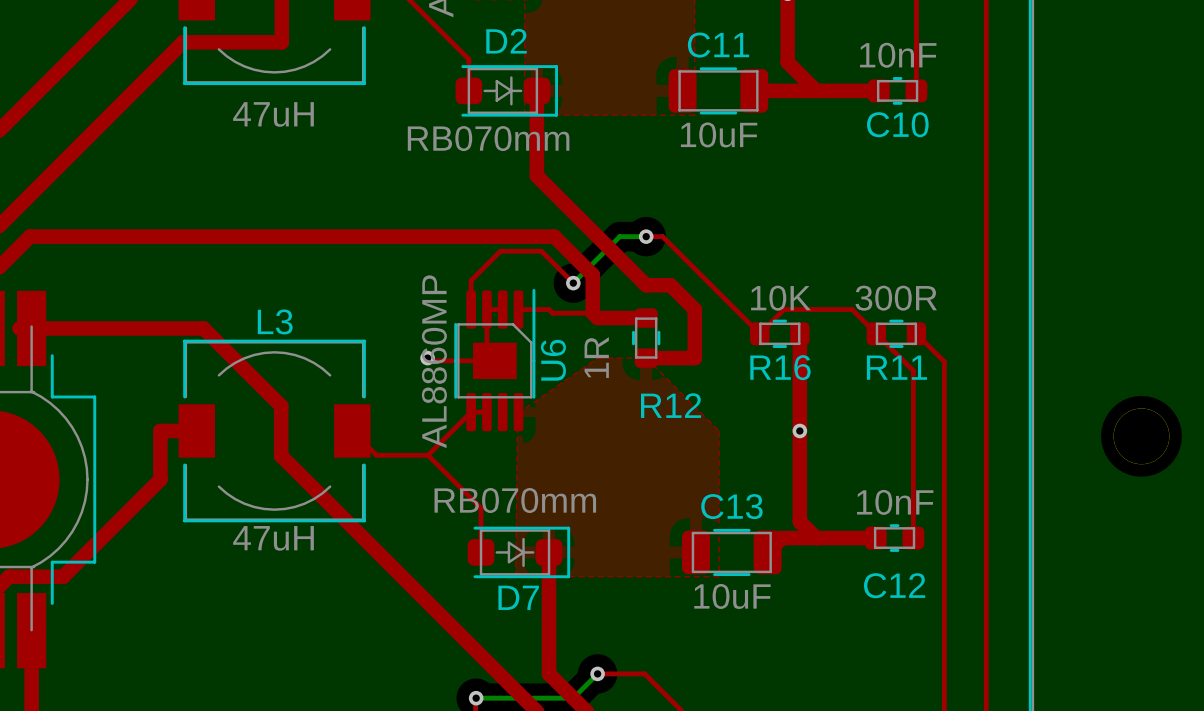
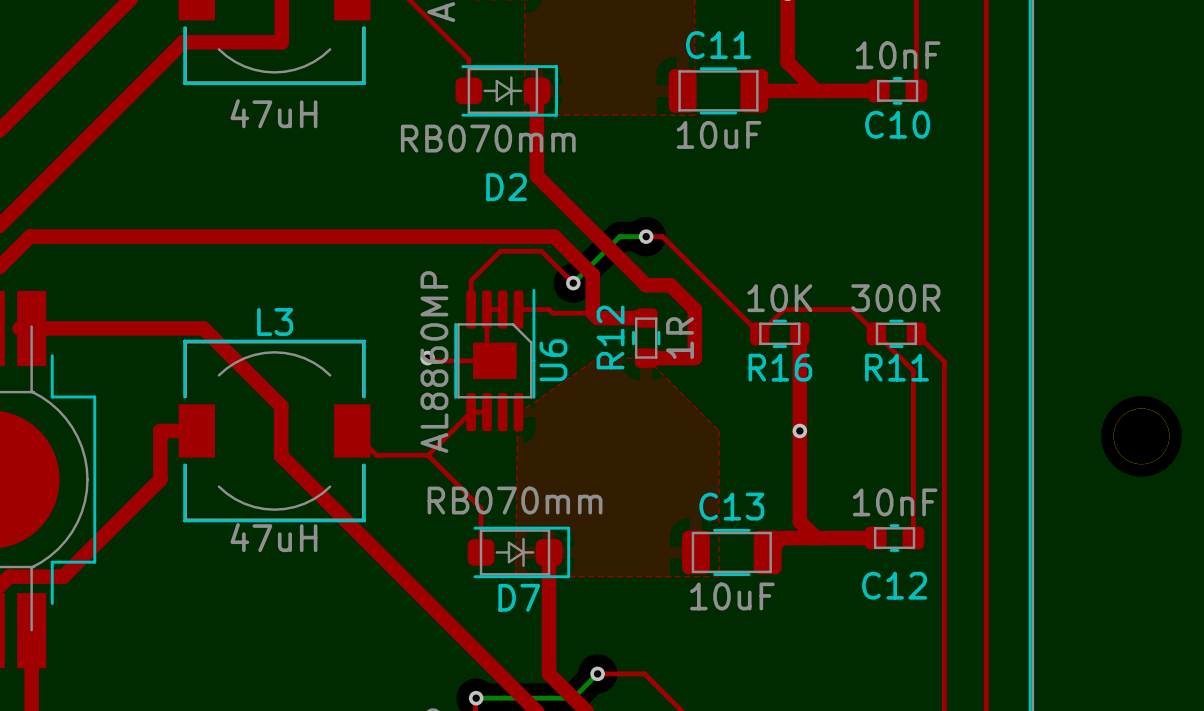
D2 name position: D2 (506, 41) -> D2 (506, 187)
R12 value position: 1R (596, 357) -> 1R (680, 338)
R12 name rotation: 0° (671, 405) -> 90° counterclockwise (610, 337)
R12 name position: R12 (671, 405) -> R12 (610, 337)

